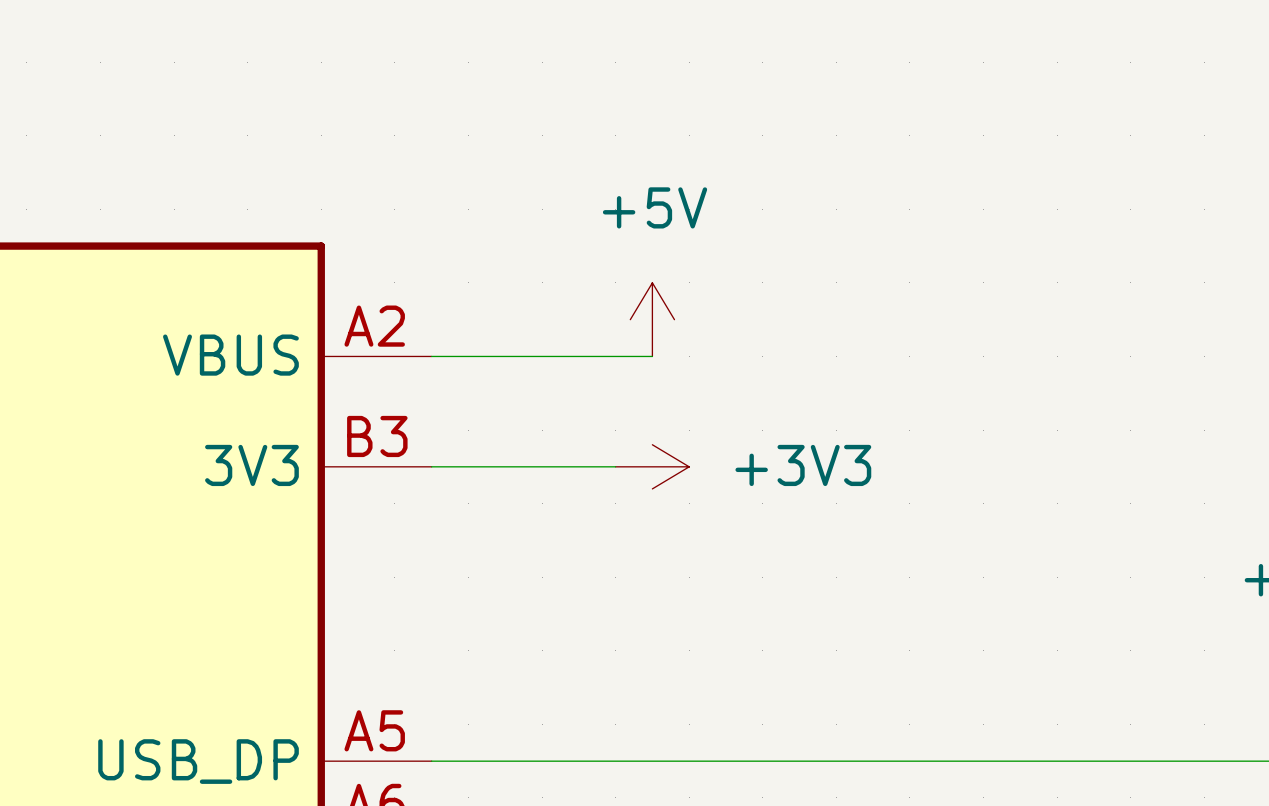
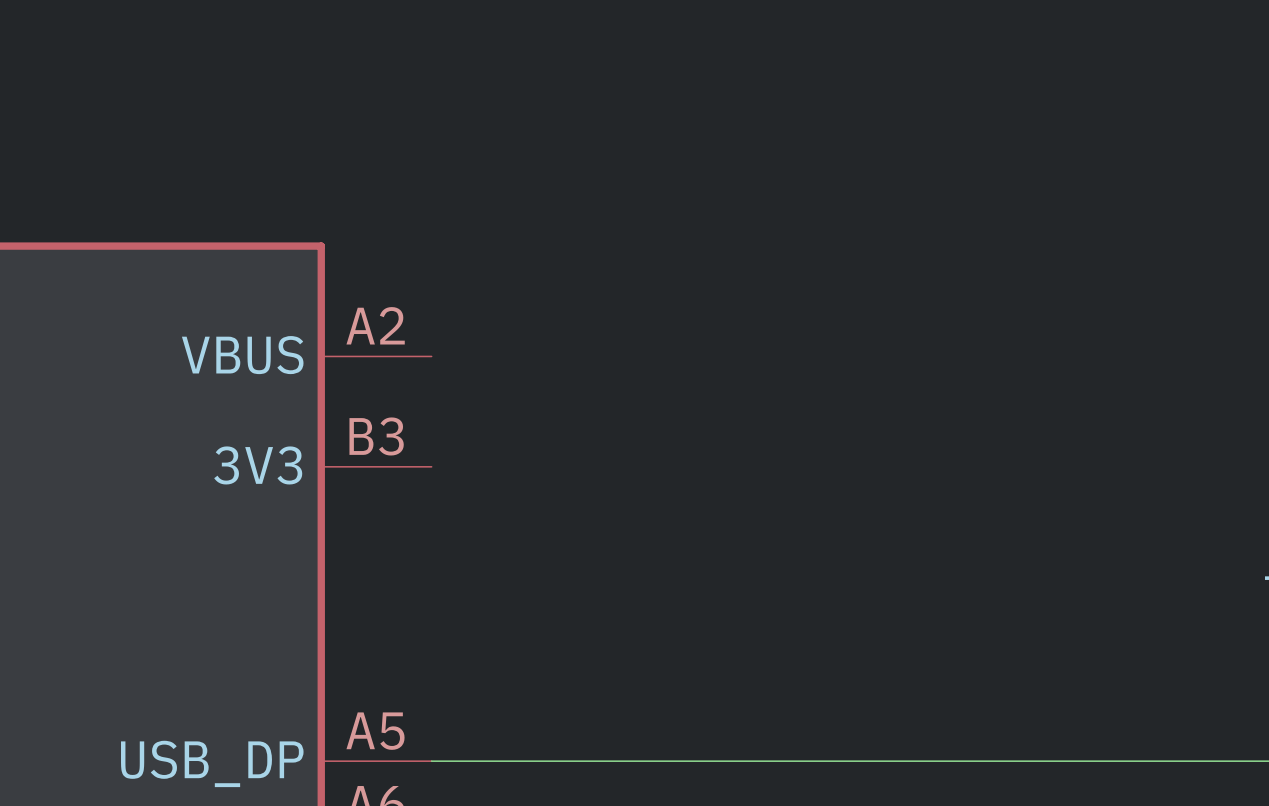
power symbol: +5V (652, 319) -> none
wire: (431, 356) (652, 356) -> none
wire: (431, 466) (615, 466) -> none
power symbol: +3V3 (652, 466) -> none

